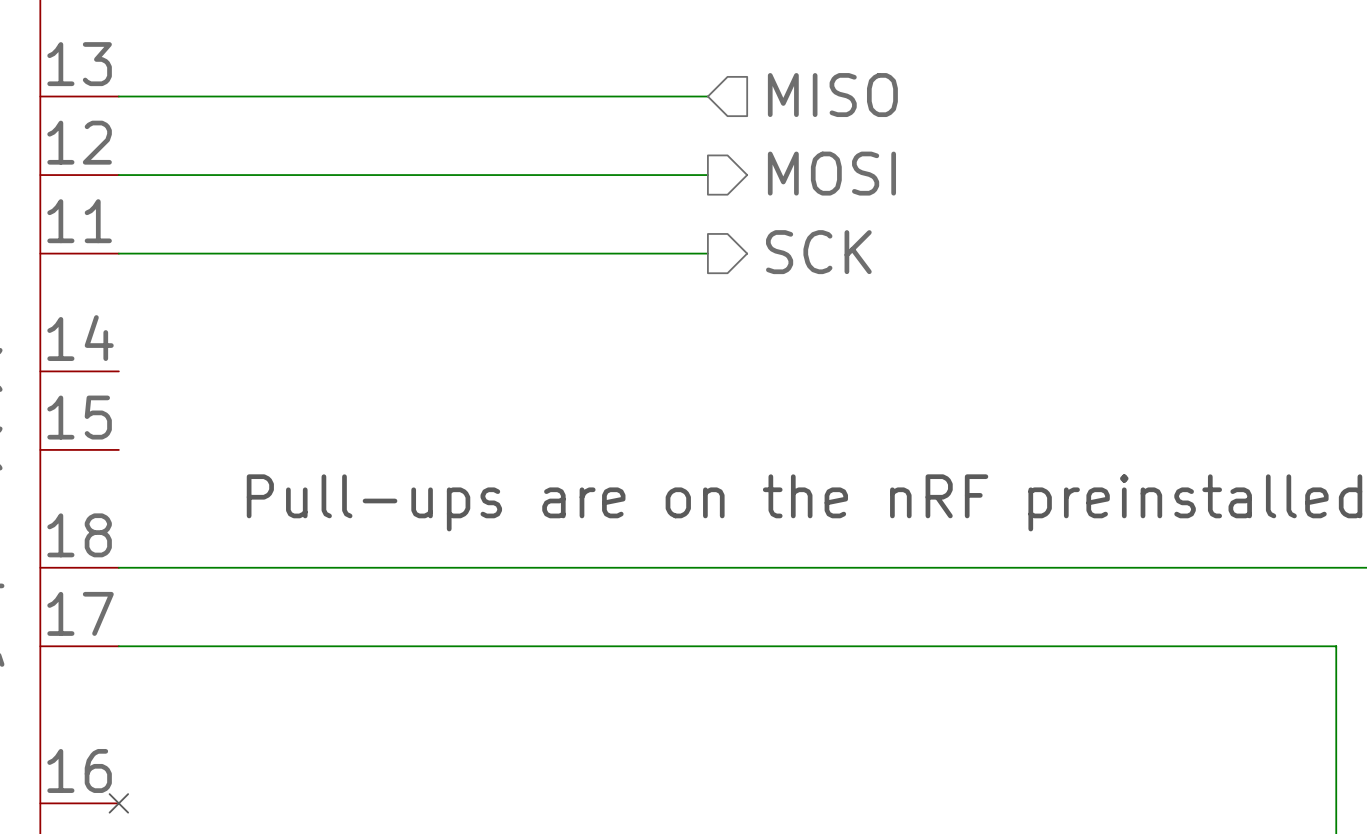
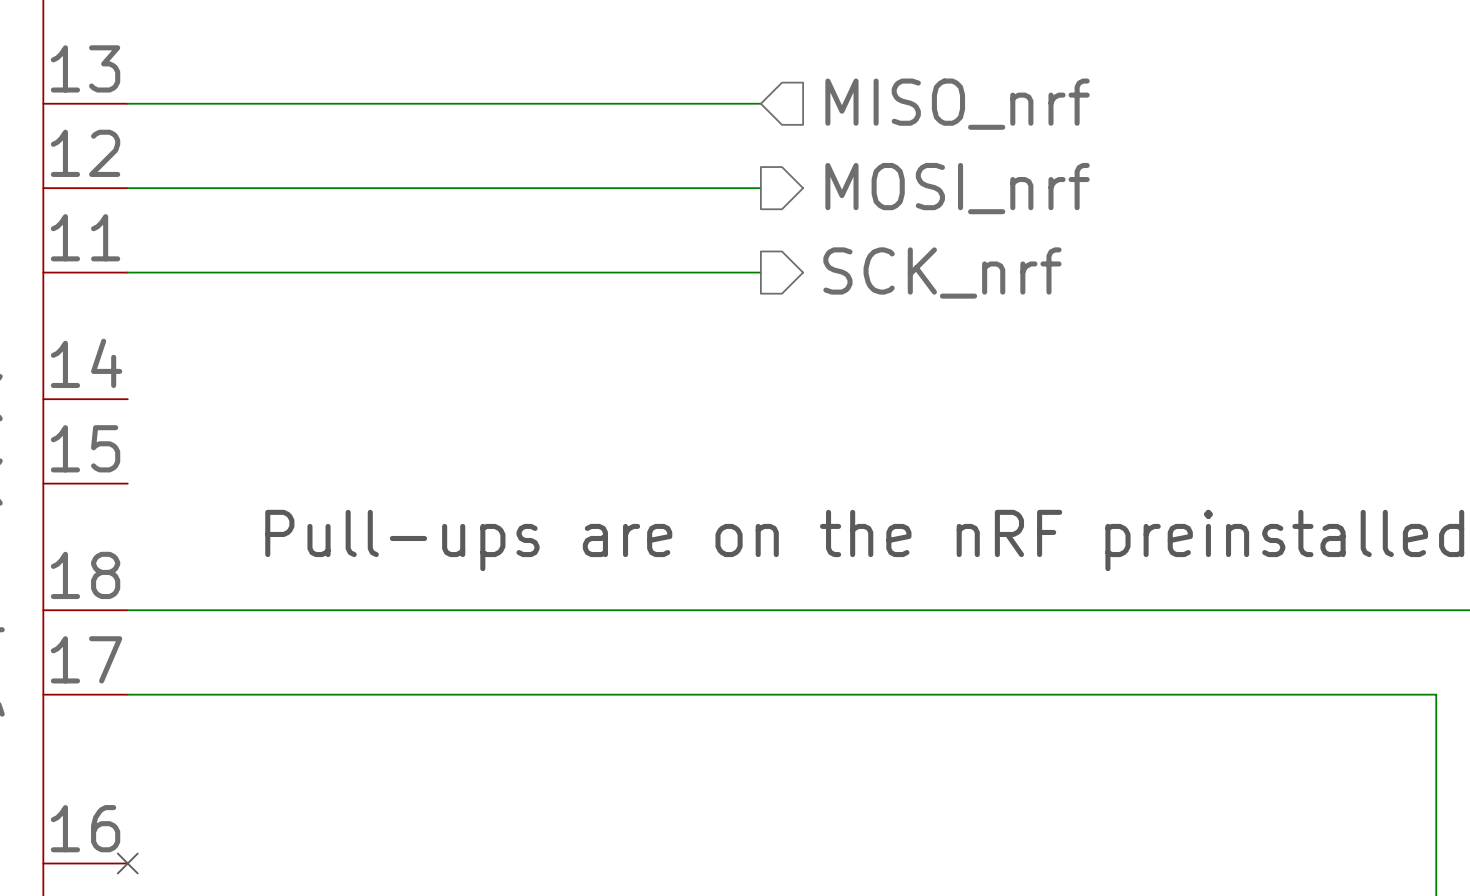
hierarchical label: MISO (832, 95) -> MISO_nrf (957, 104)
hierarchical label: MOSI (831, 173) -> MOSI_nrf (957, 188)
hierarchical label: SCK (818, 252) -> SCK_nrf (942, 273)

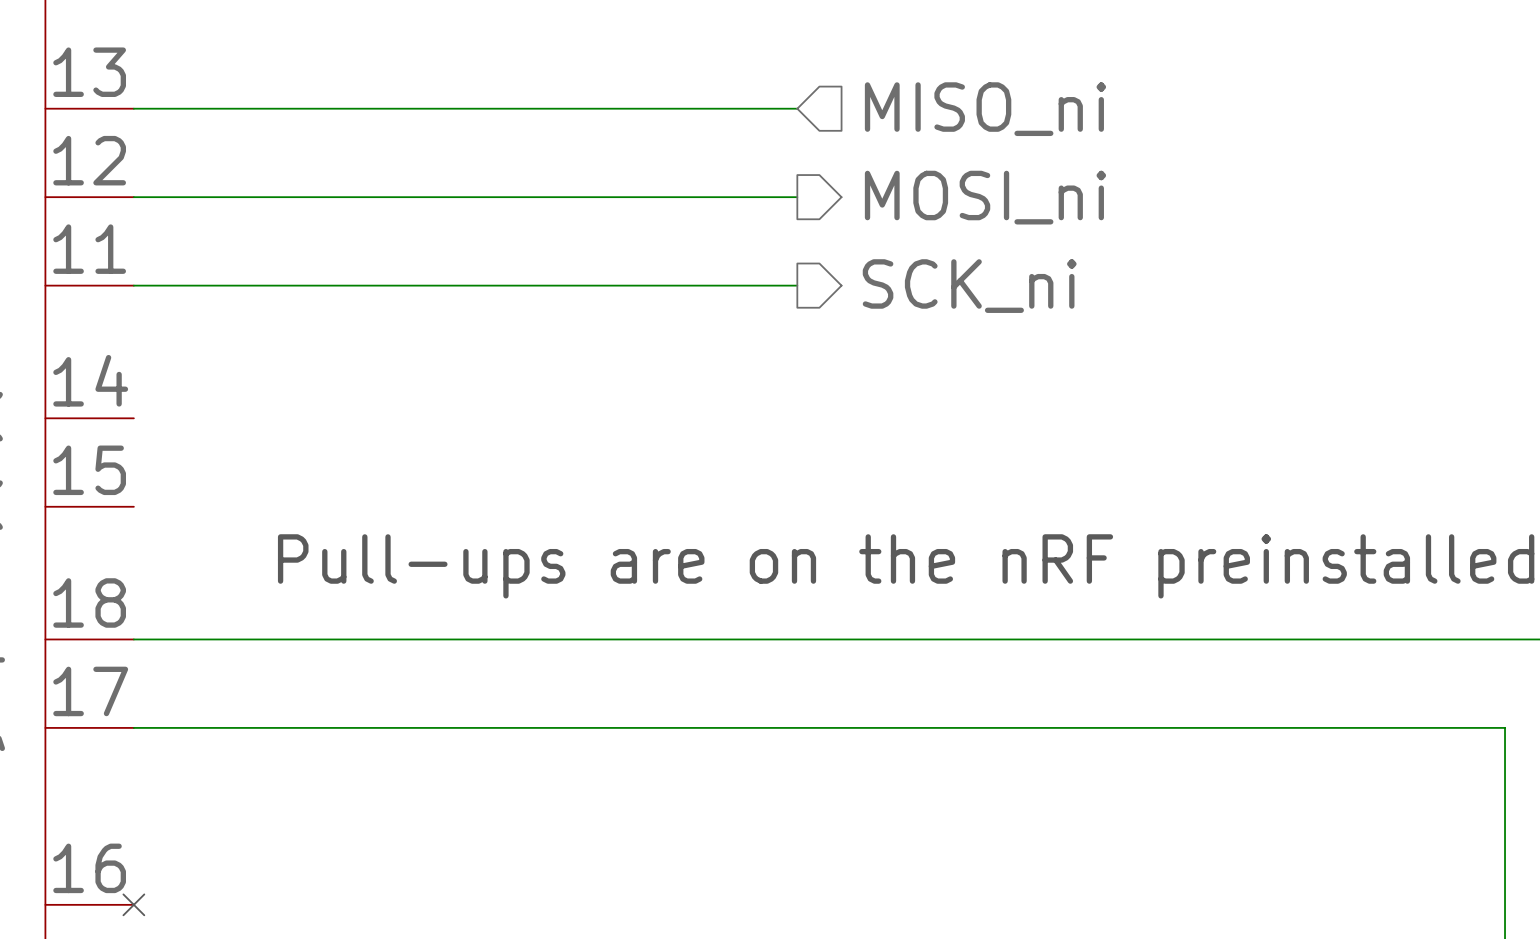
hierarchical label: MISO_nrf (957, 104) -> MISO_ni (985, 109)
hierarchical label: MOSI_nrf (957, 188) -> MOSI_ni (985, 197)
hierarchical label: SCK_nrf (942, 273) -> SCK_ni (969, 286)

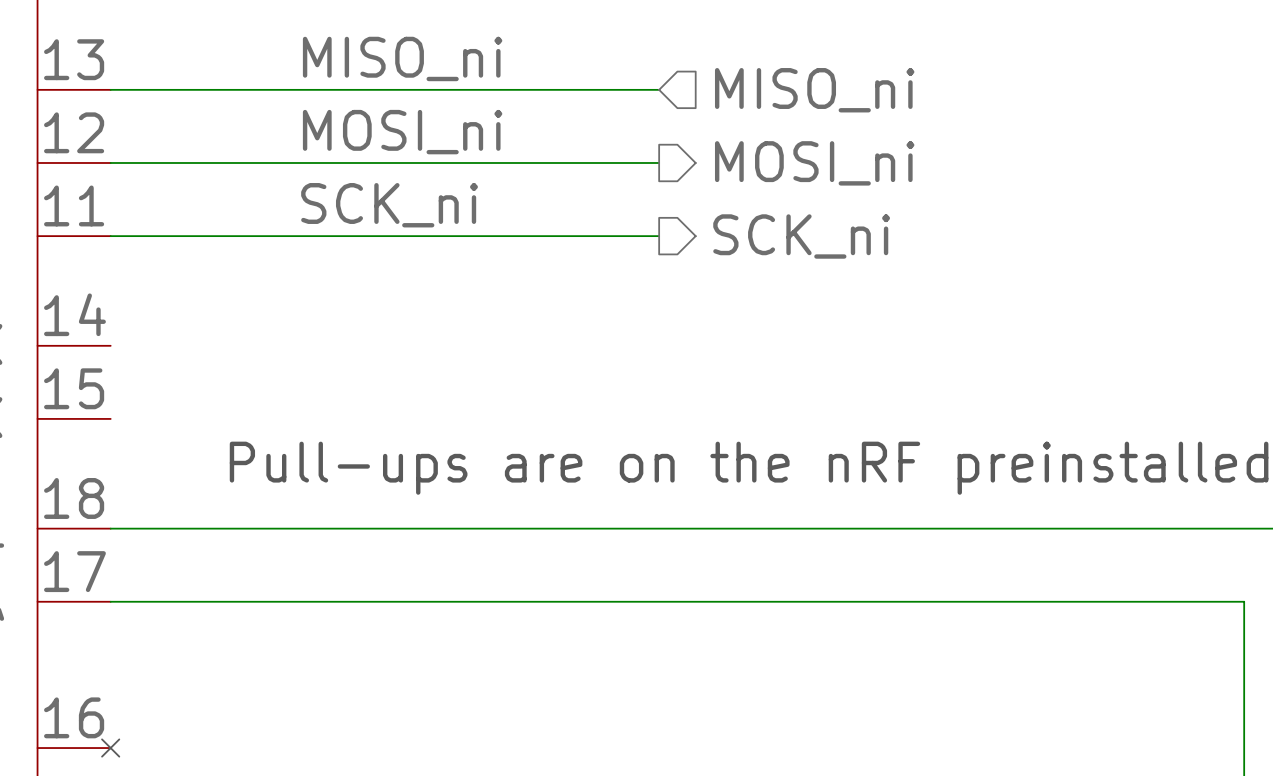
label: none -> MISO_ni (402, 58)
label: none -> MOSI_ni (402, 132)
label: none -> SCK_ni (389, 205)

